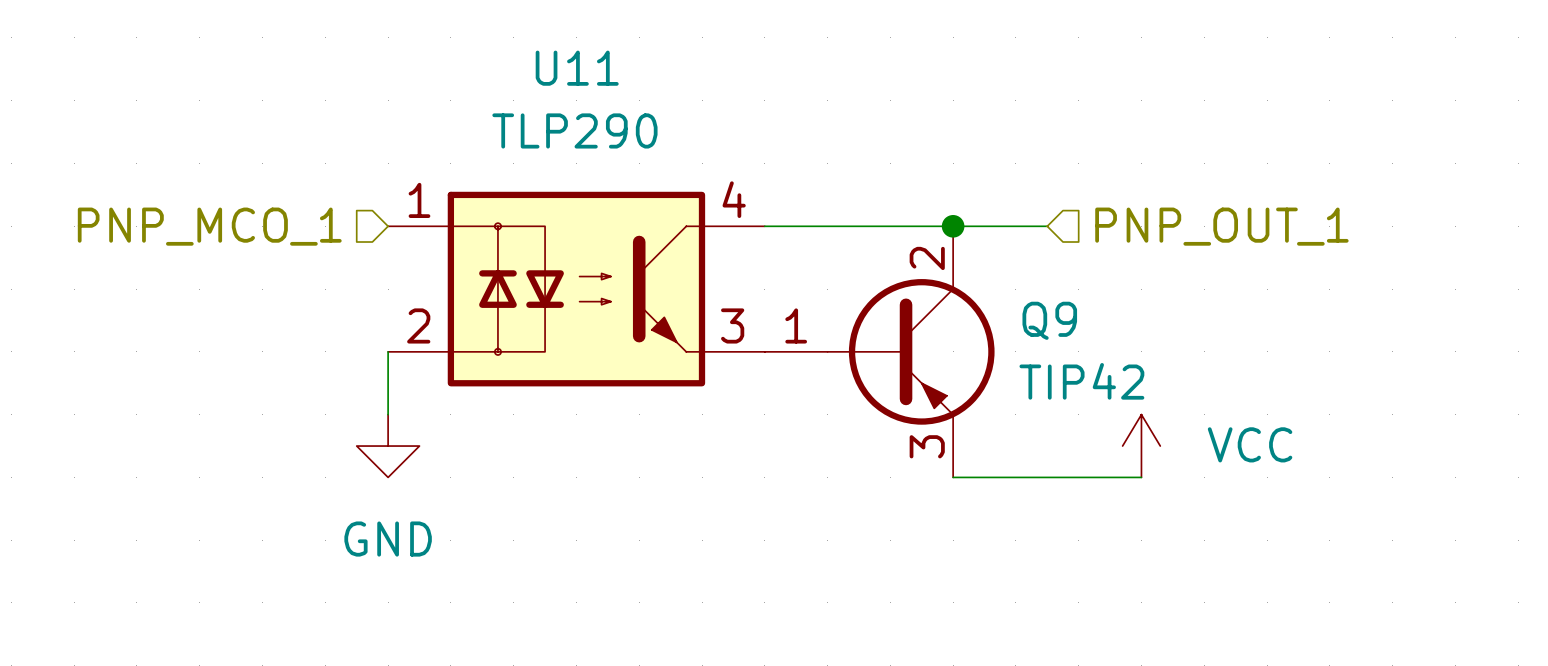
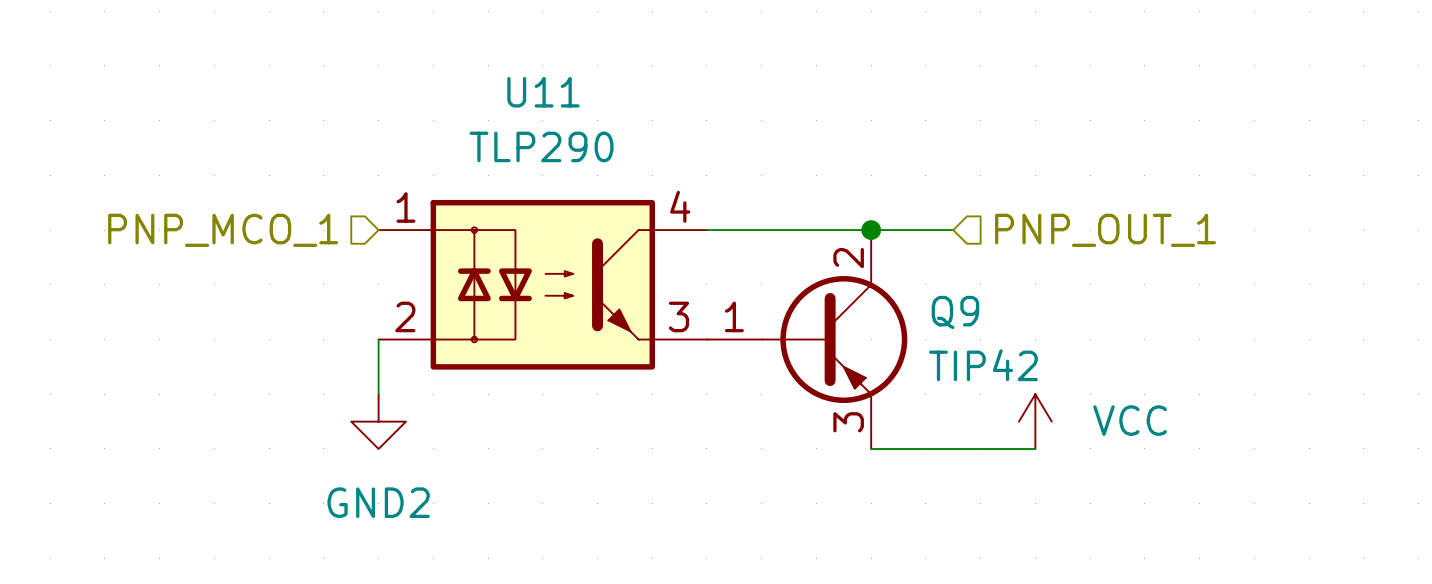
power symbol: GND (388, 446) -> GND2 (378, 421)

